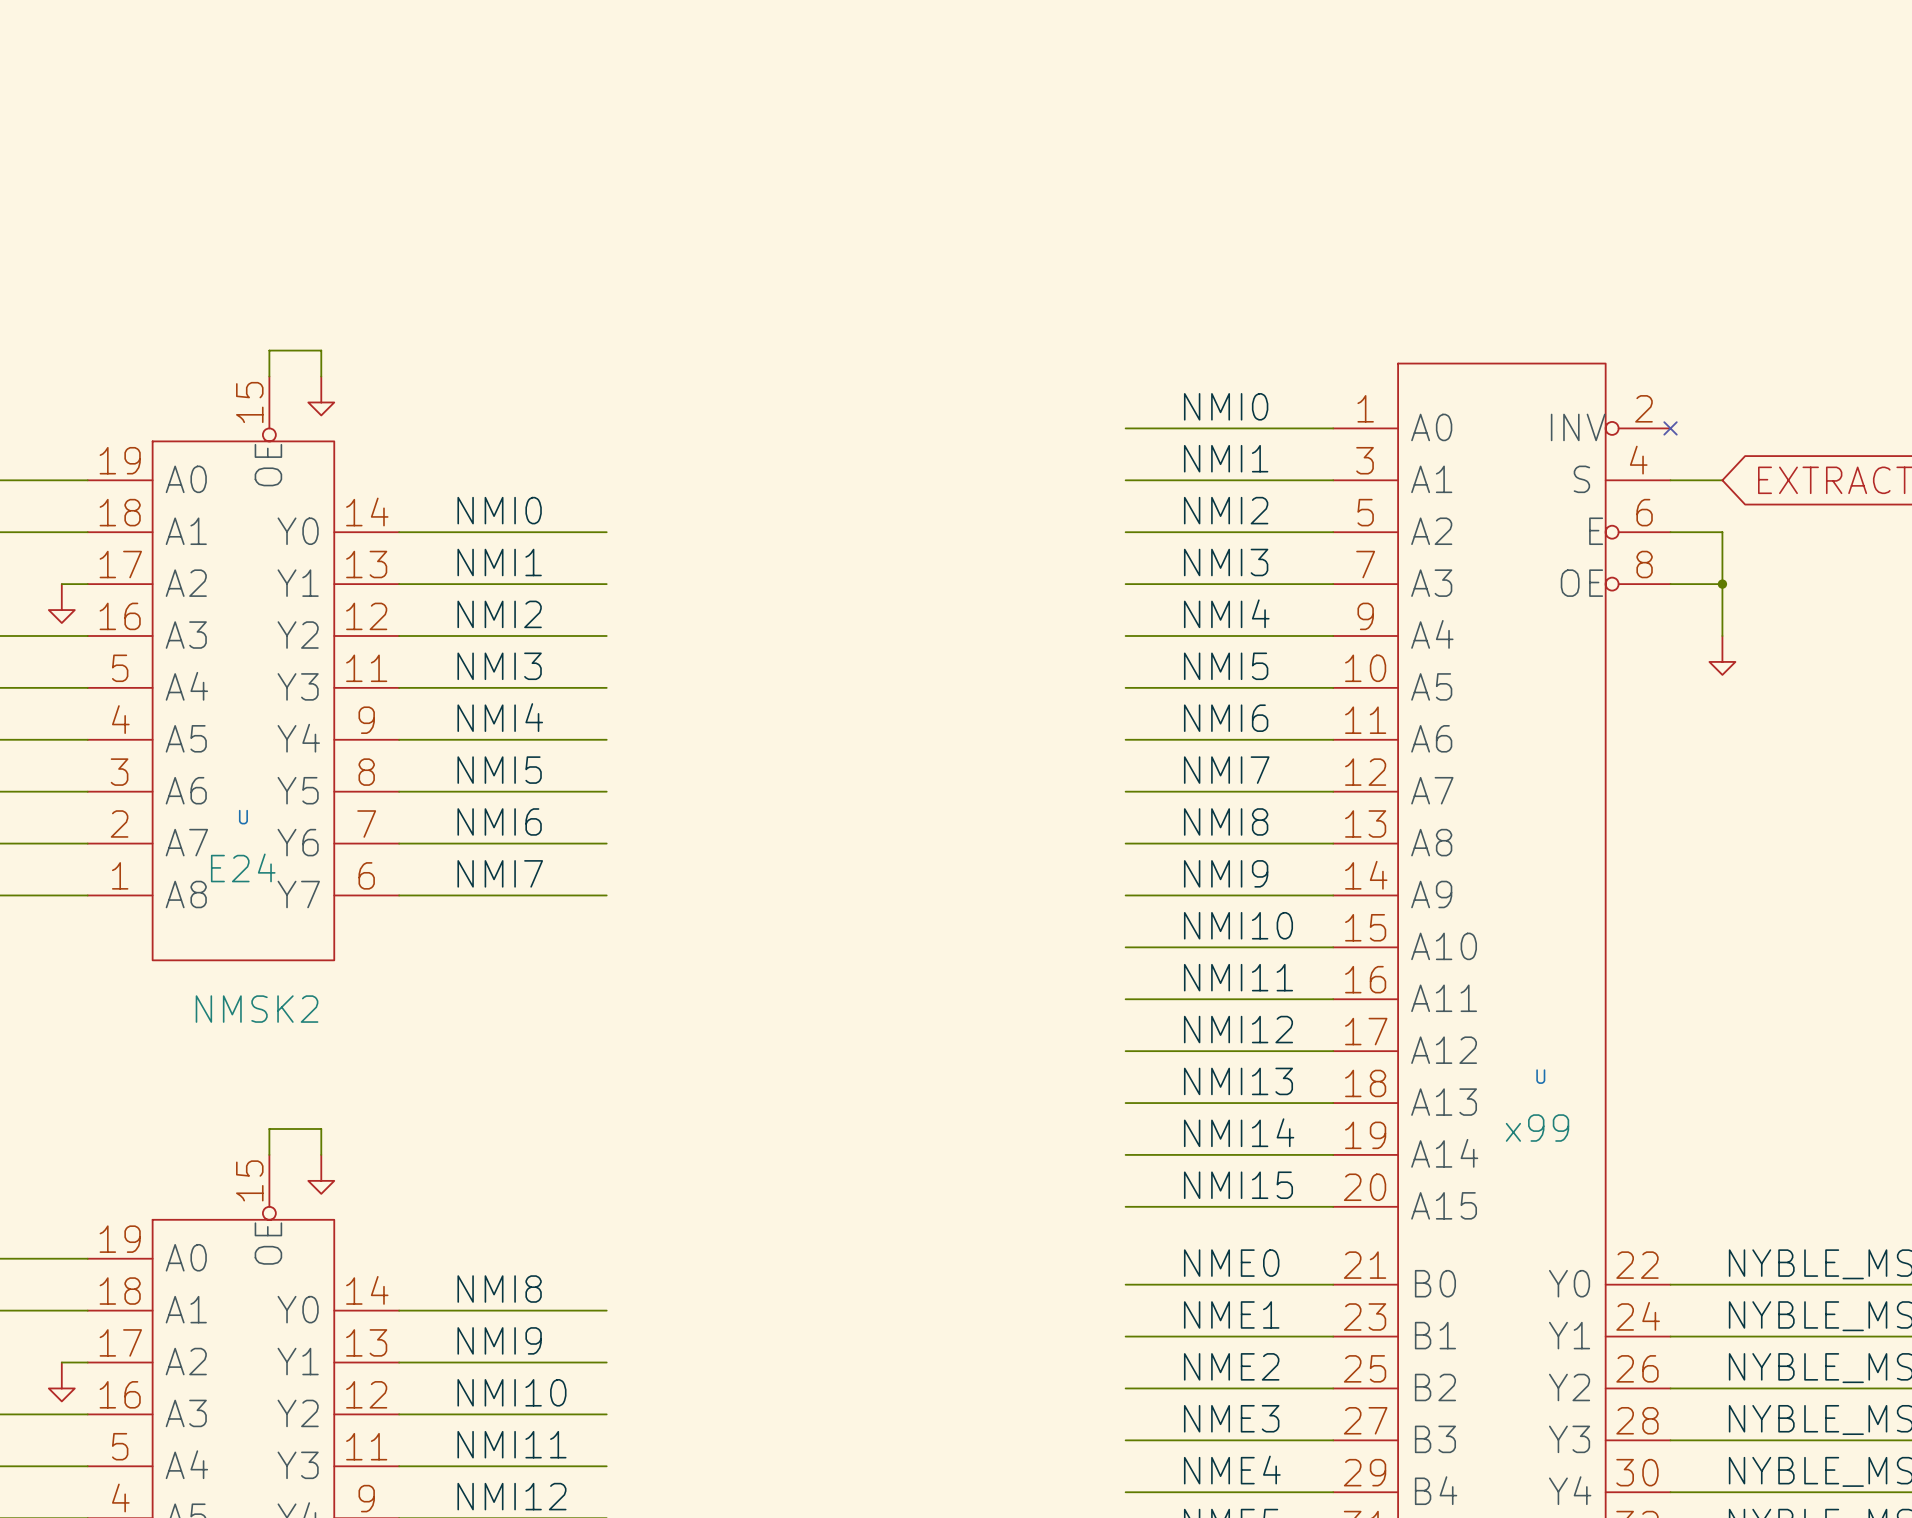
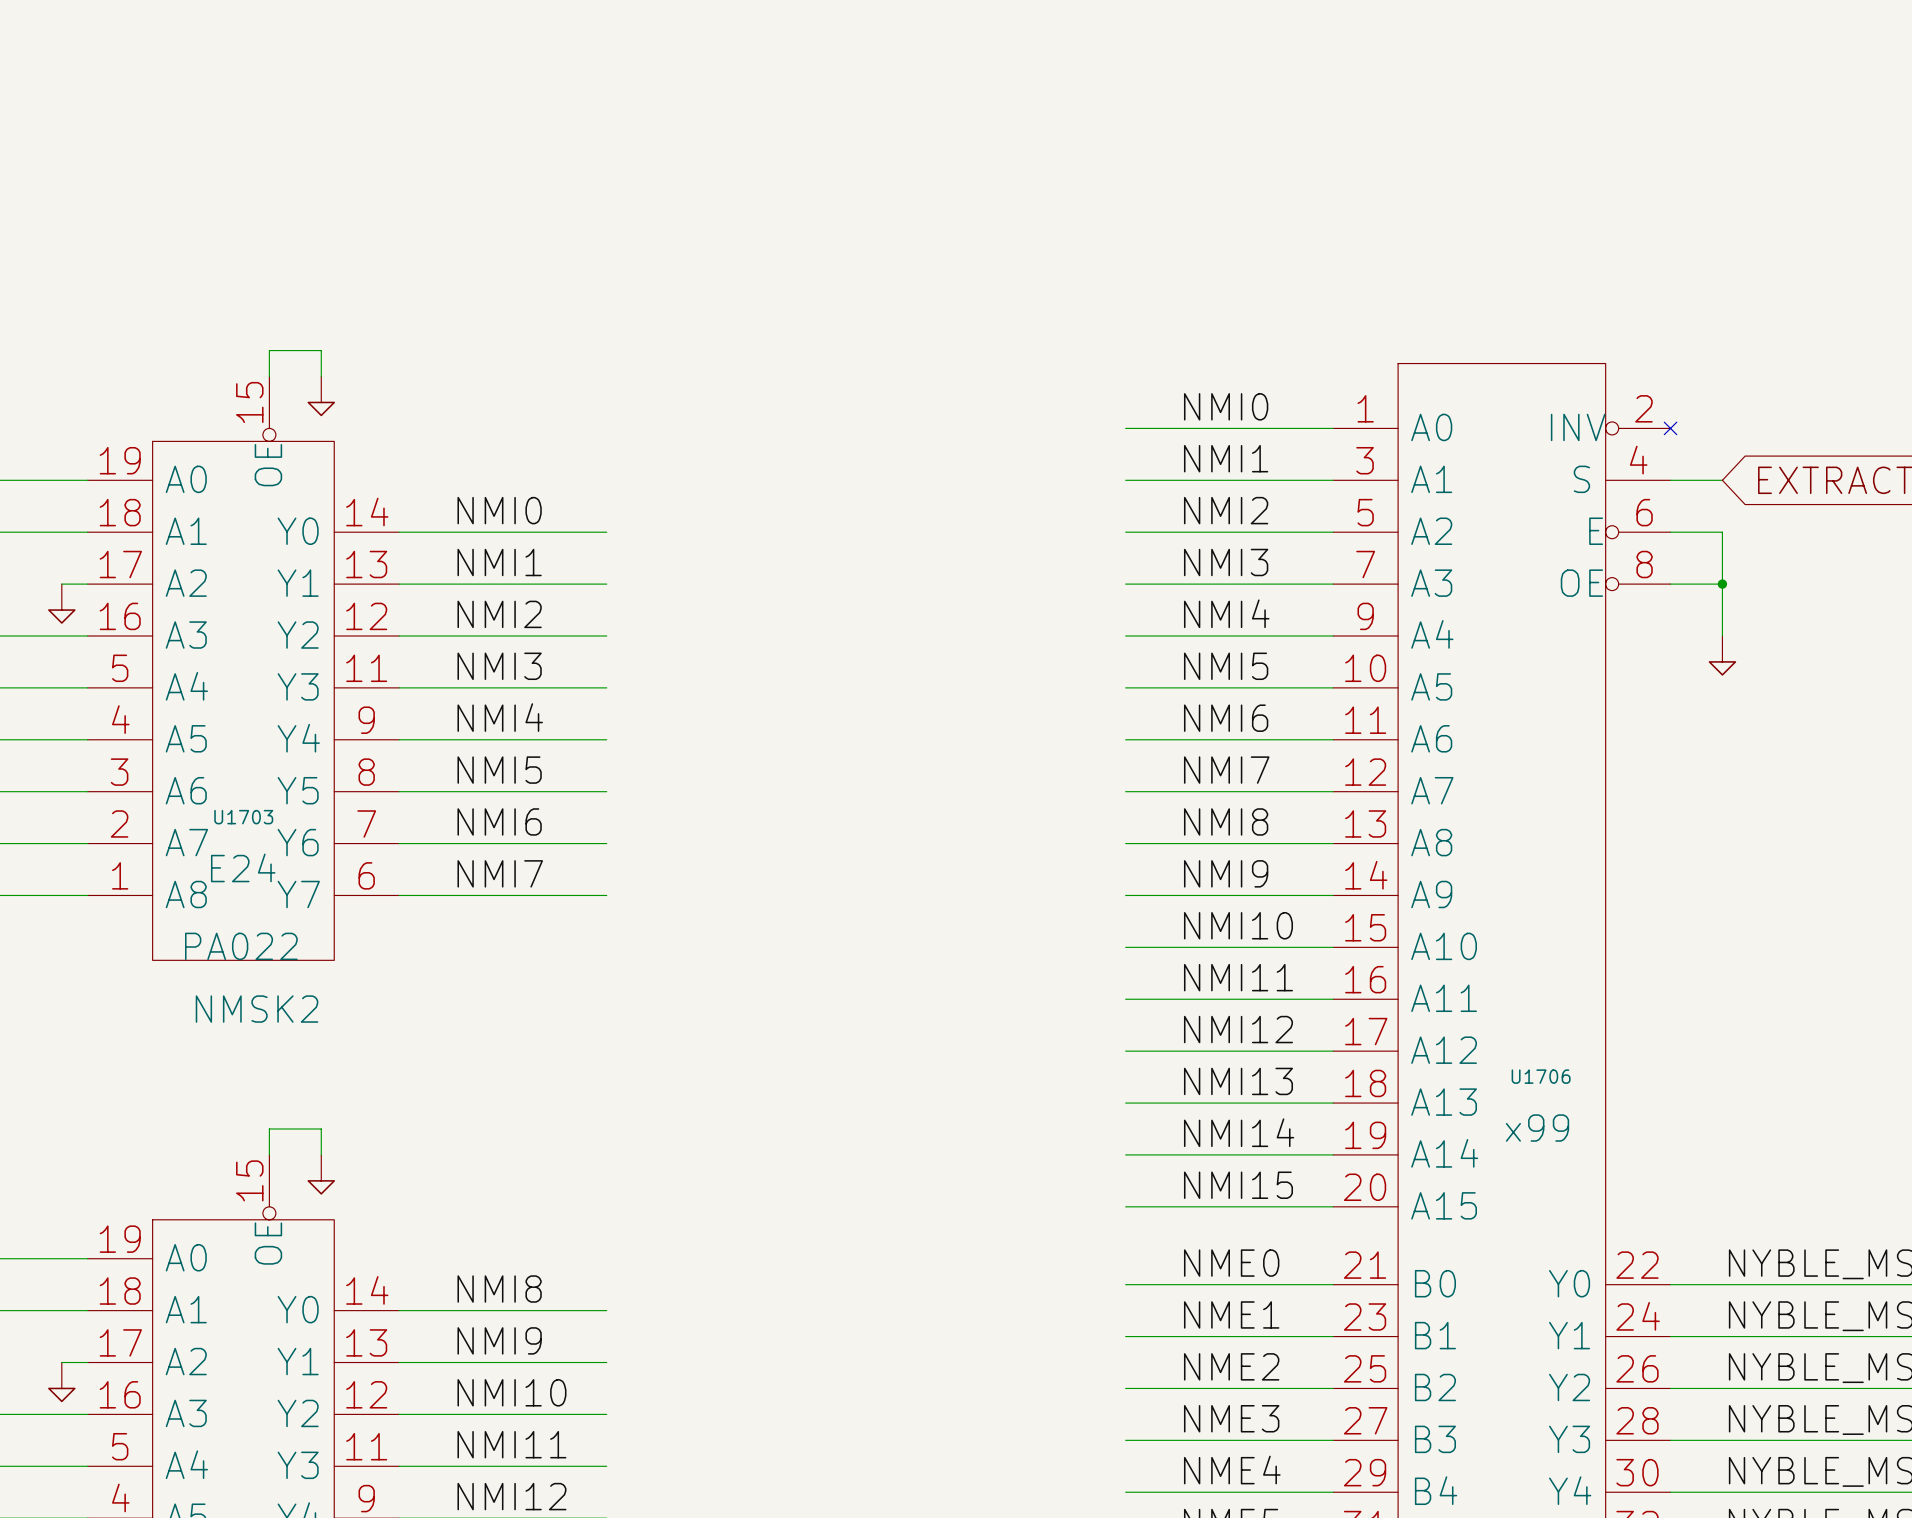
U name: U (243, 817) -> U1703 (243, 817)
U value: none -> PA022 (241, 946)
U name: U (1540, 1076) -> U1706 (1541, 1076)

